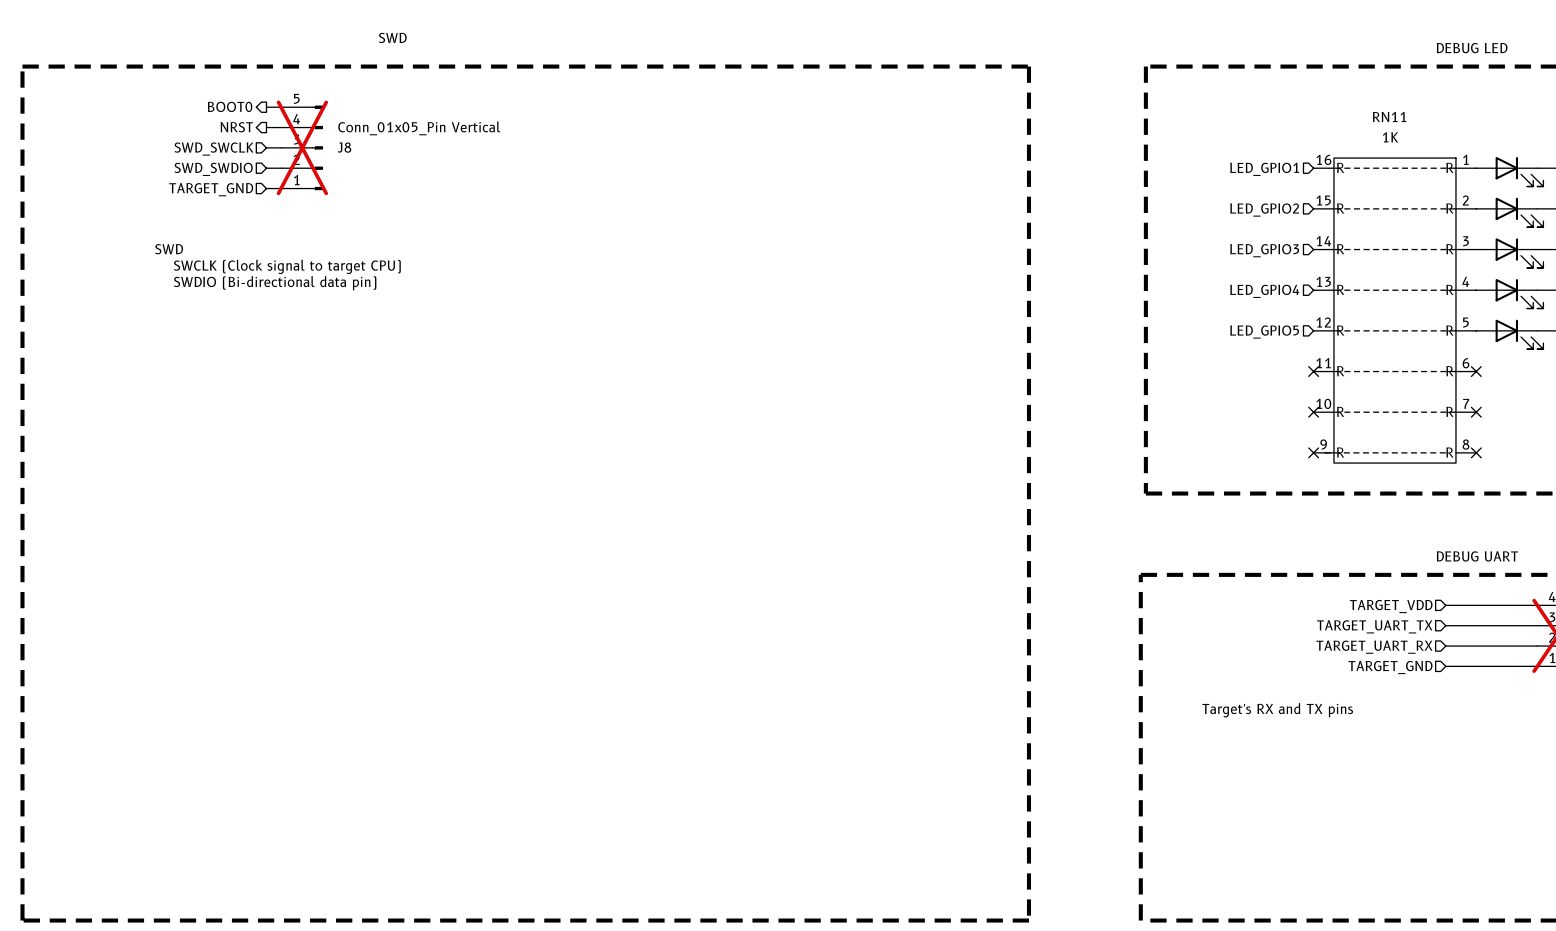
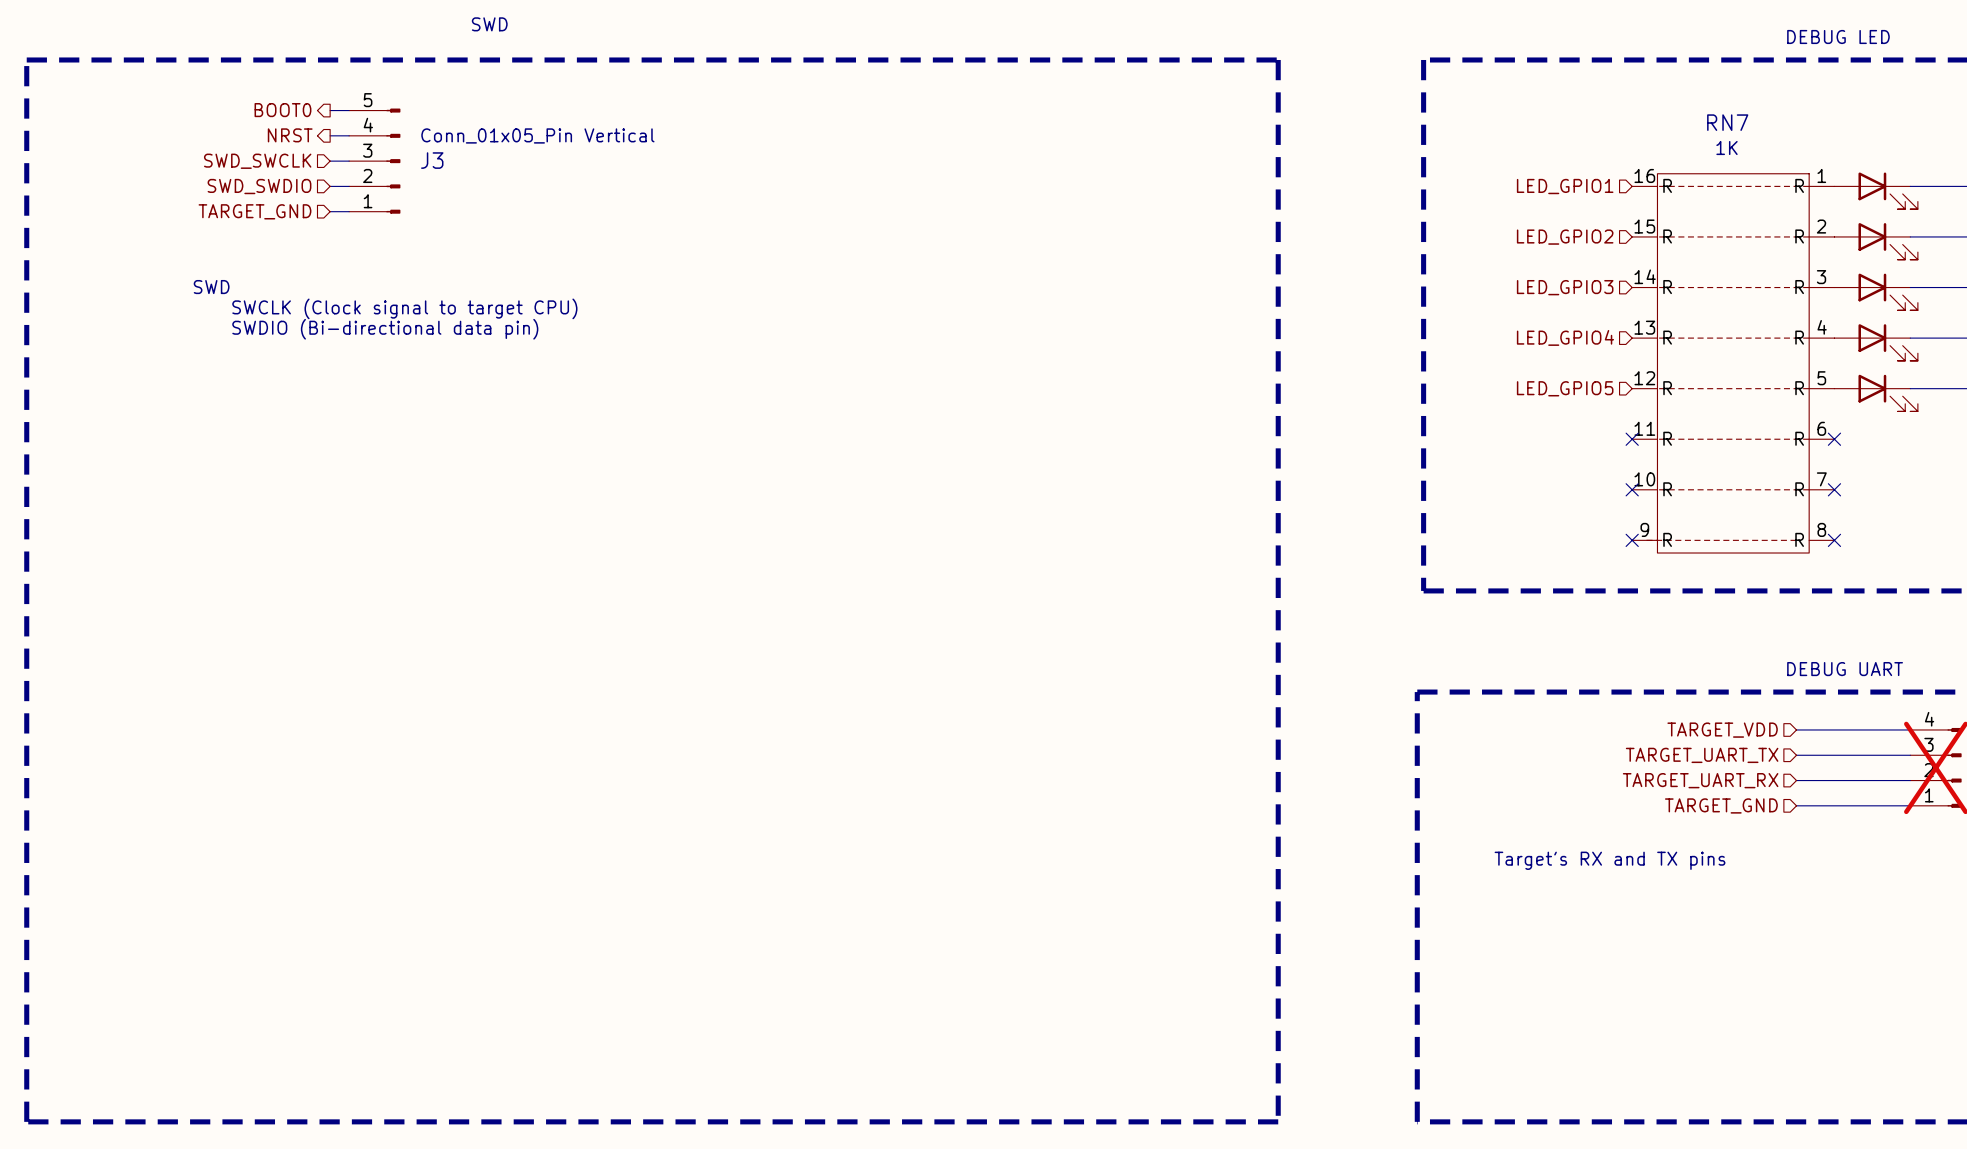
RN11 name: RN11 (1389, 117) -> RN7 (1727, 122)
J8 do-not-place cross: (302, 147) -> none
J8 name: J8 (344, 147) -> J3 (432, 160)

